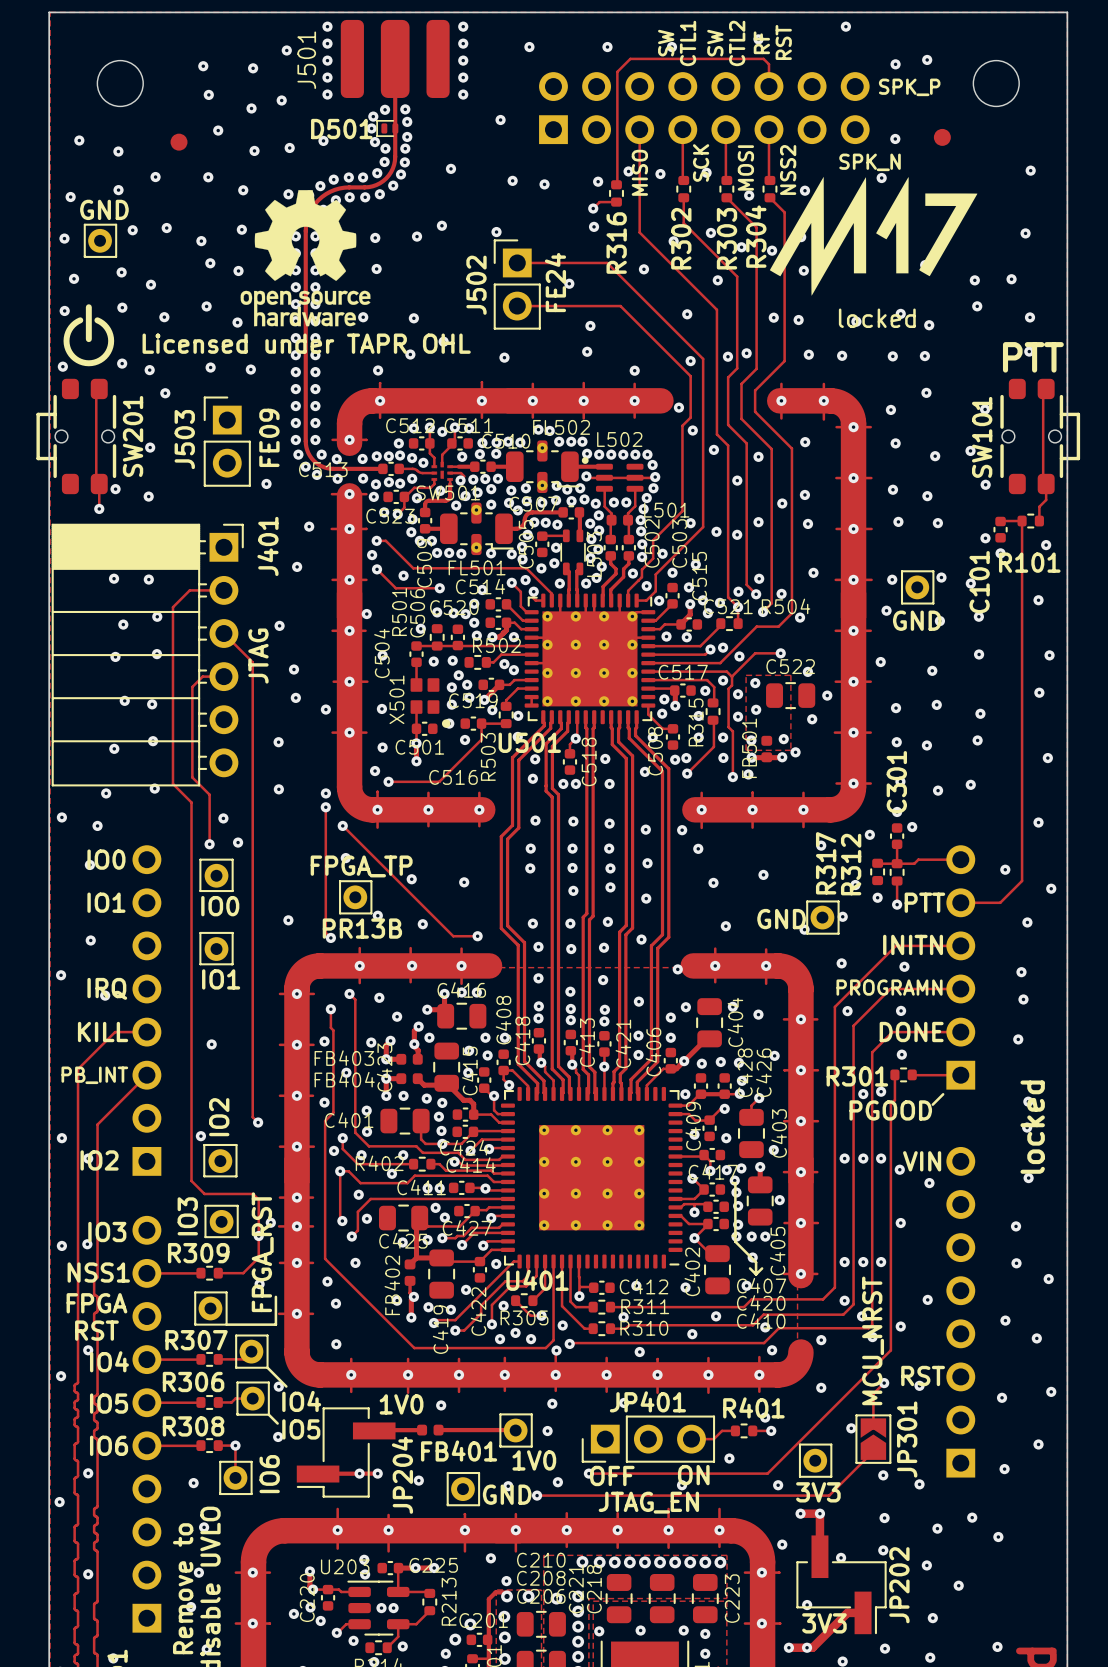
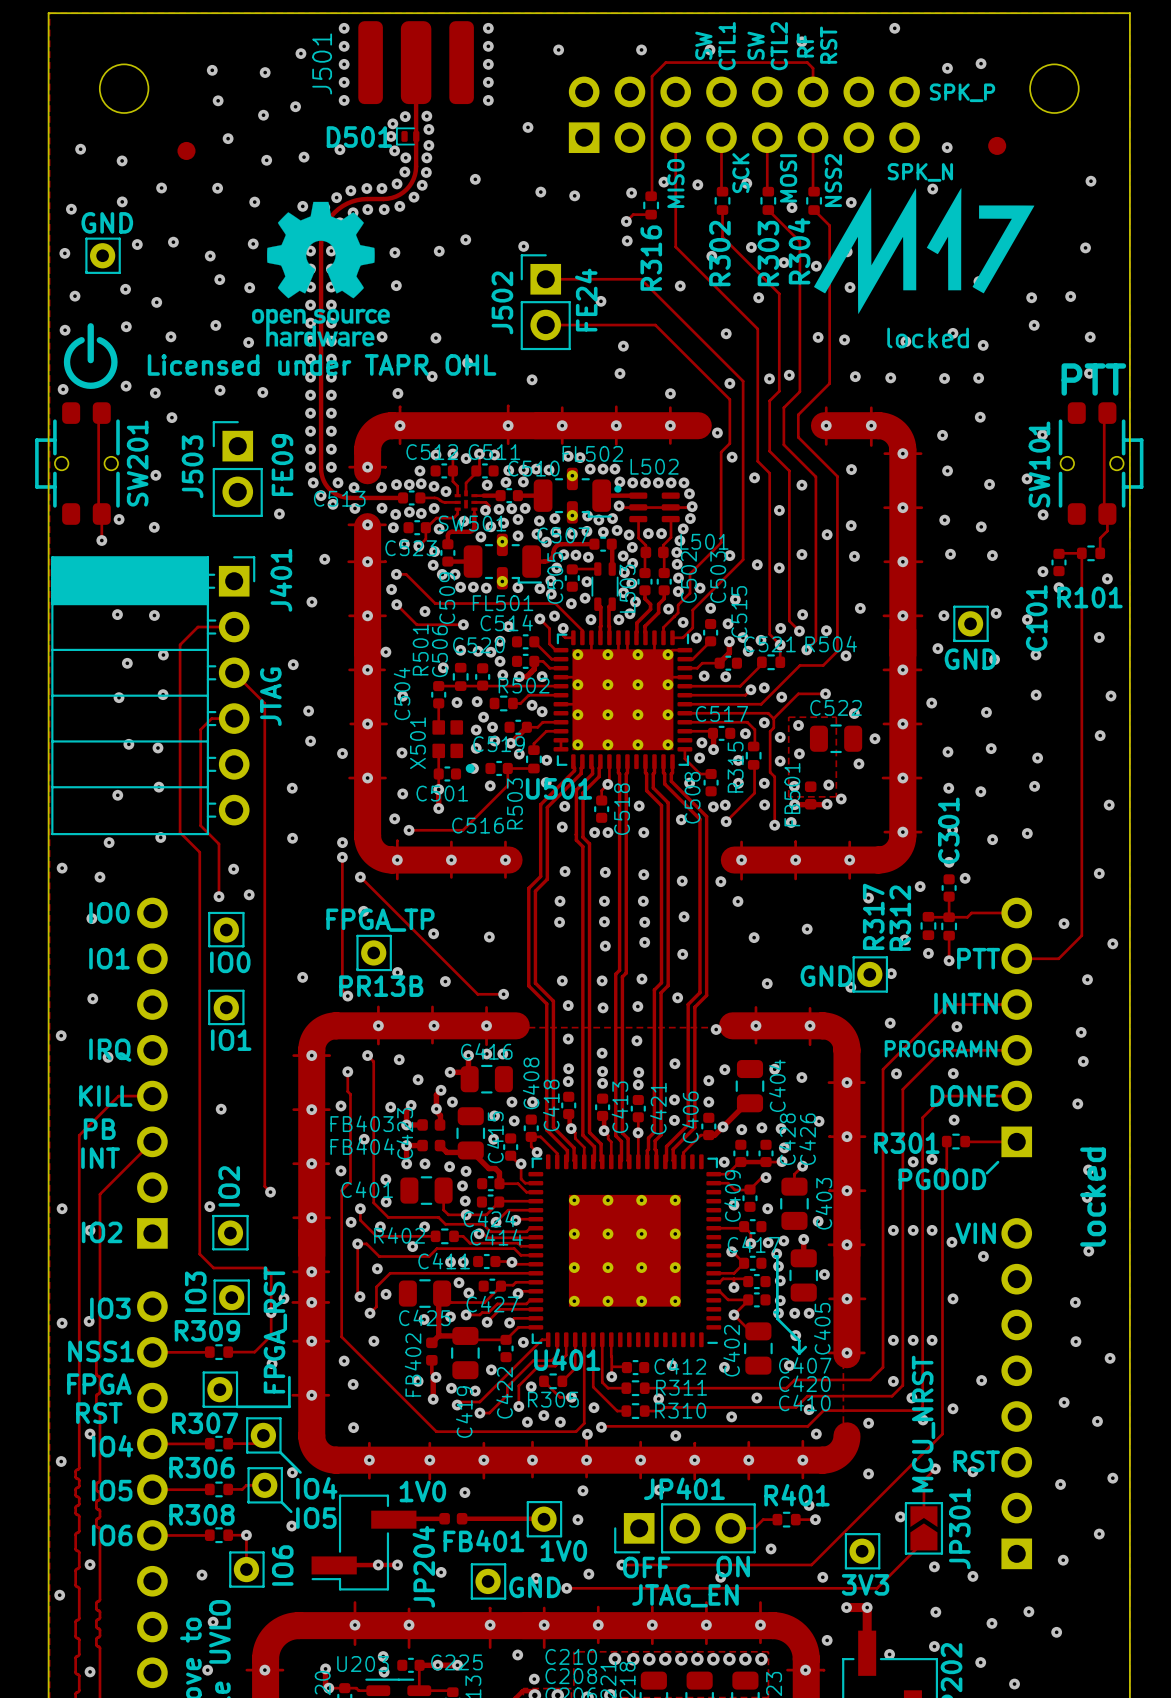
text: none -> PB (99, 1129)
text: PB_INT (94, 1075) -> INT (100, 1158)

